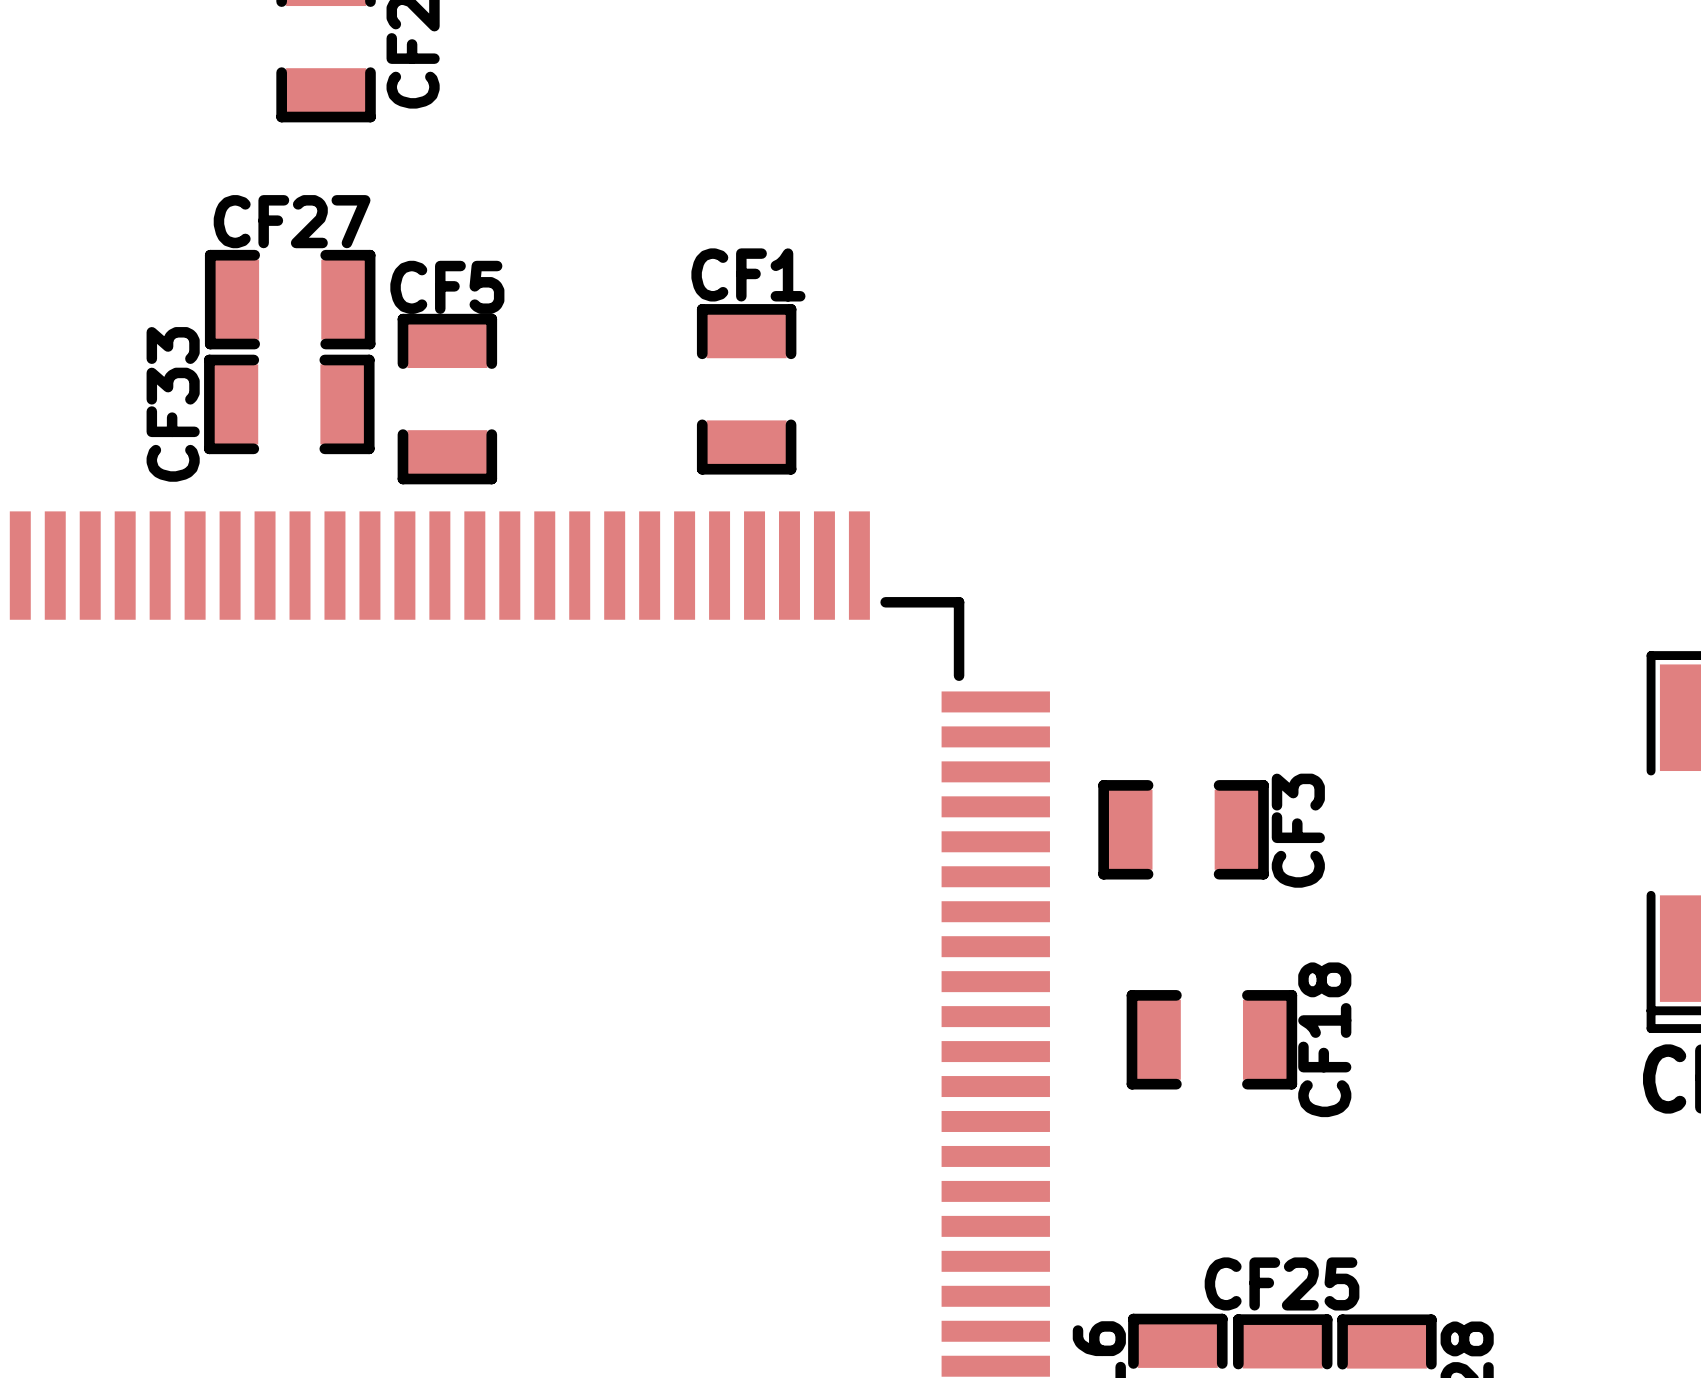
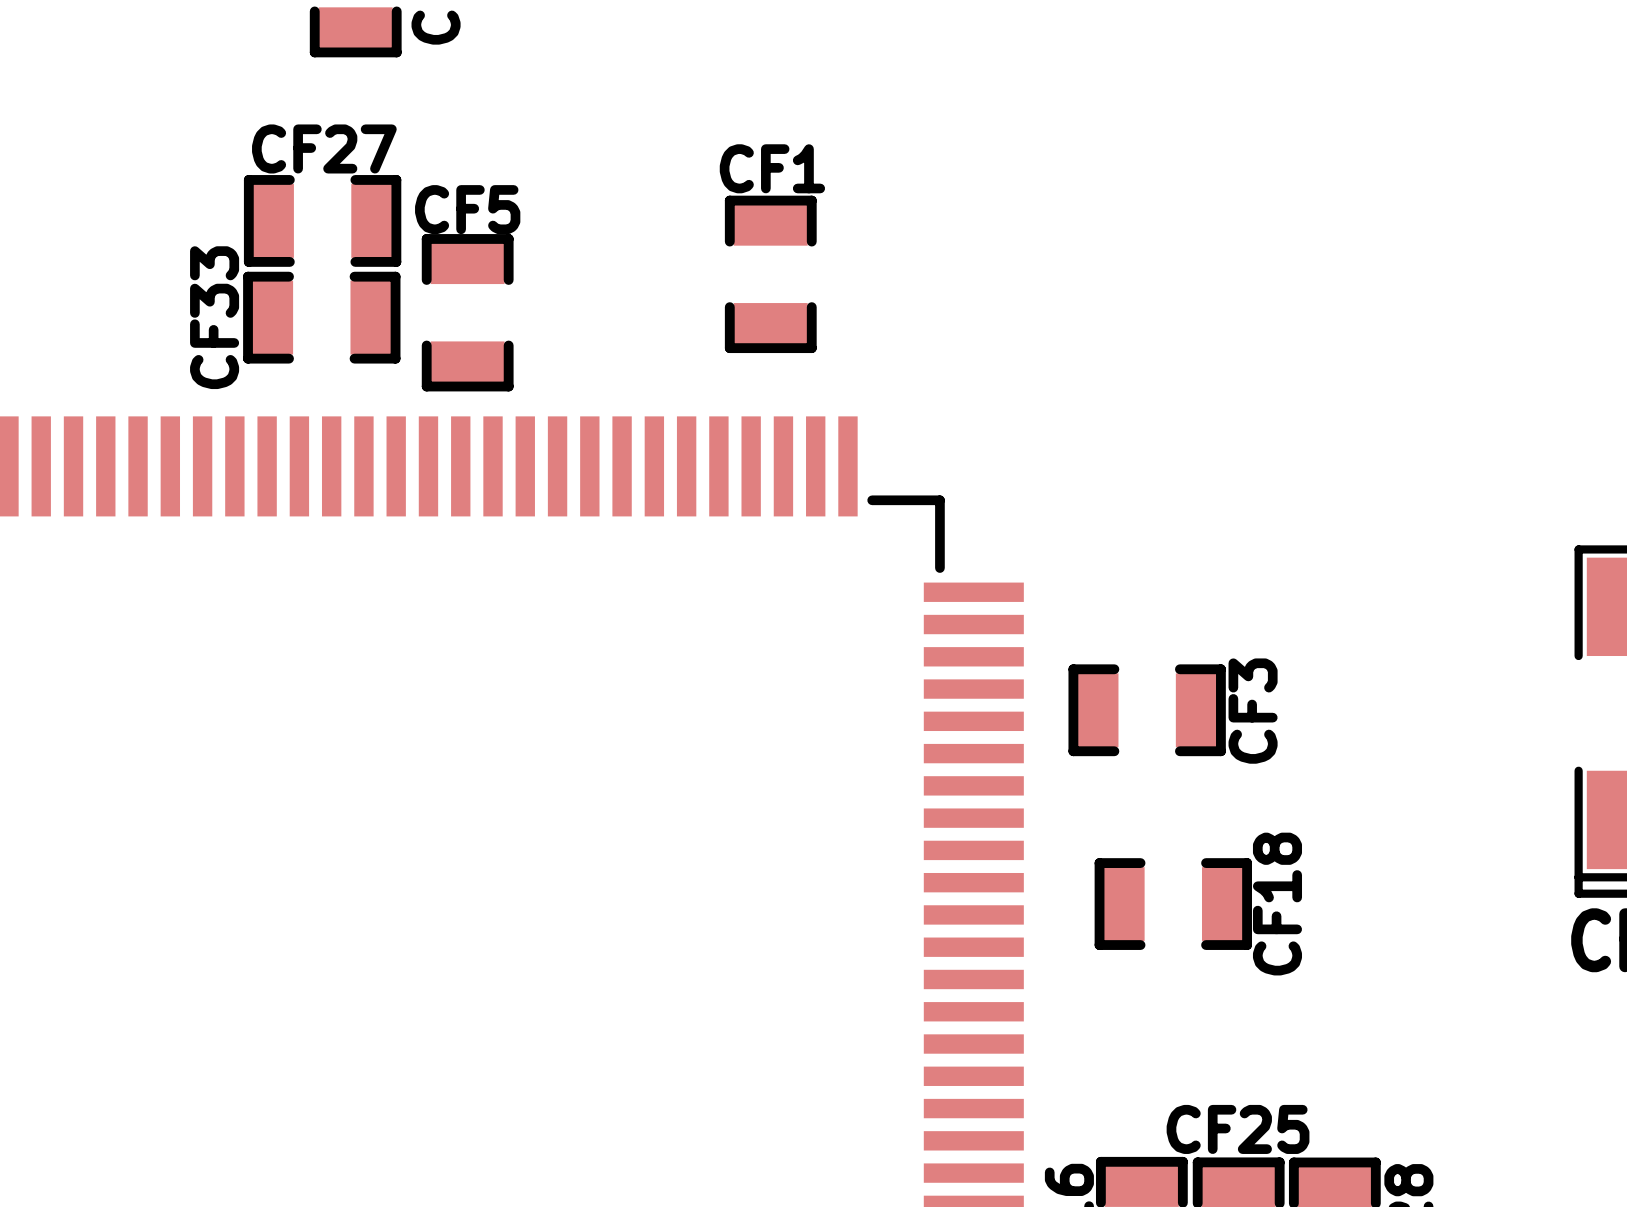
CF1 position: (746, 389) -> (770, 274)

